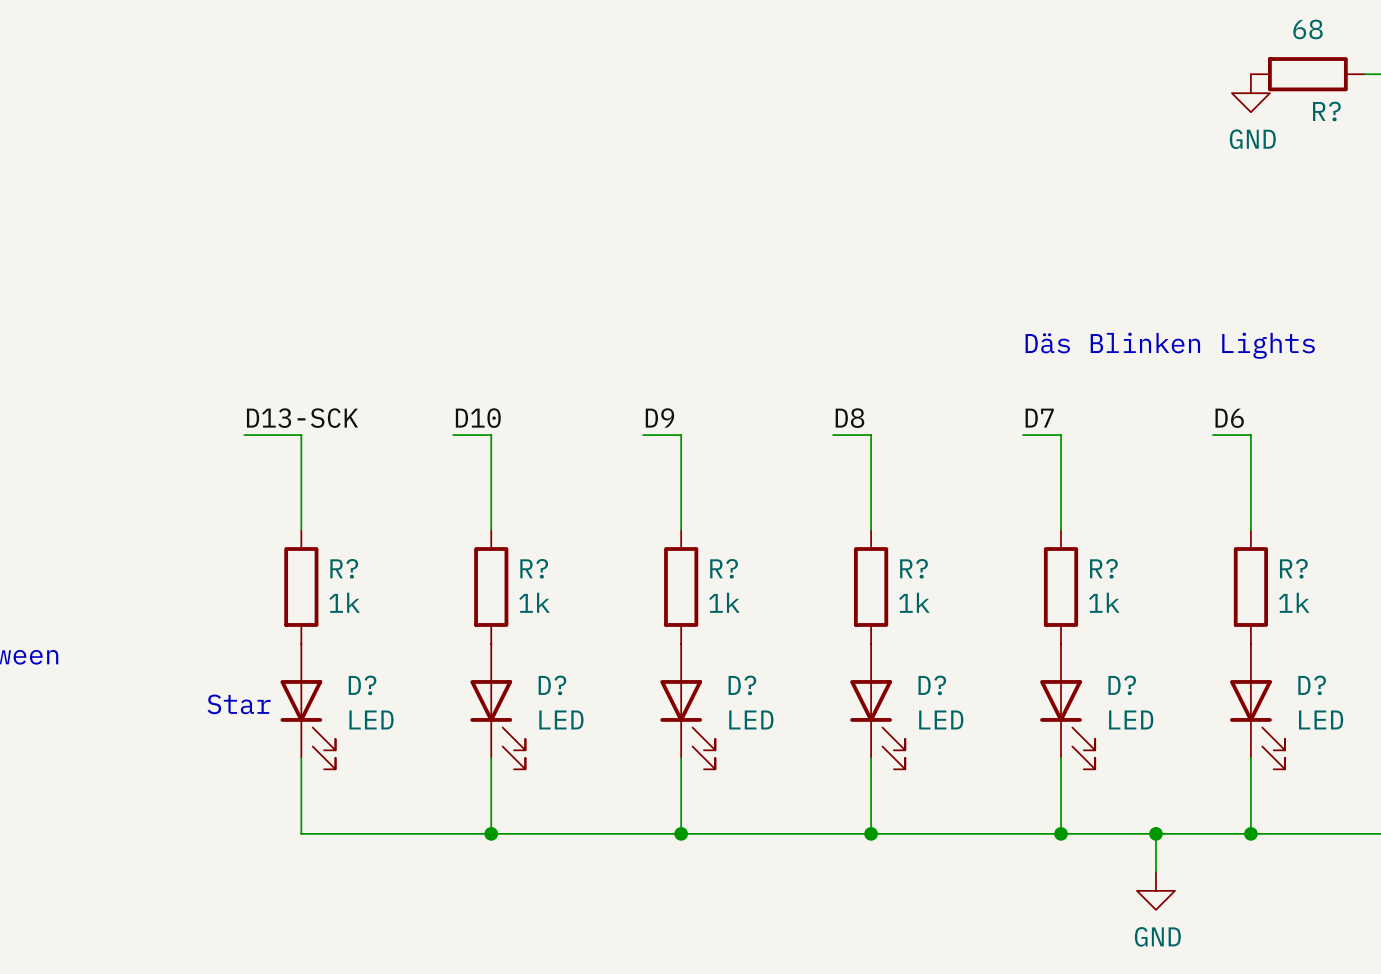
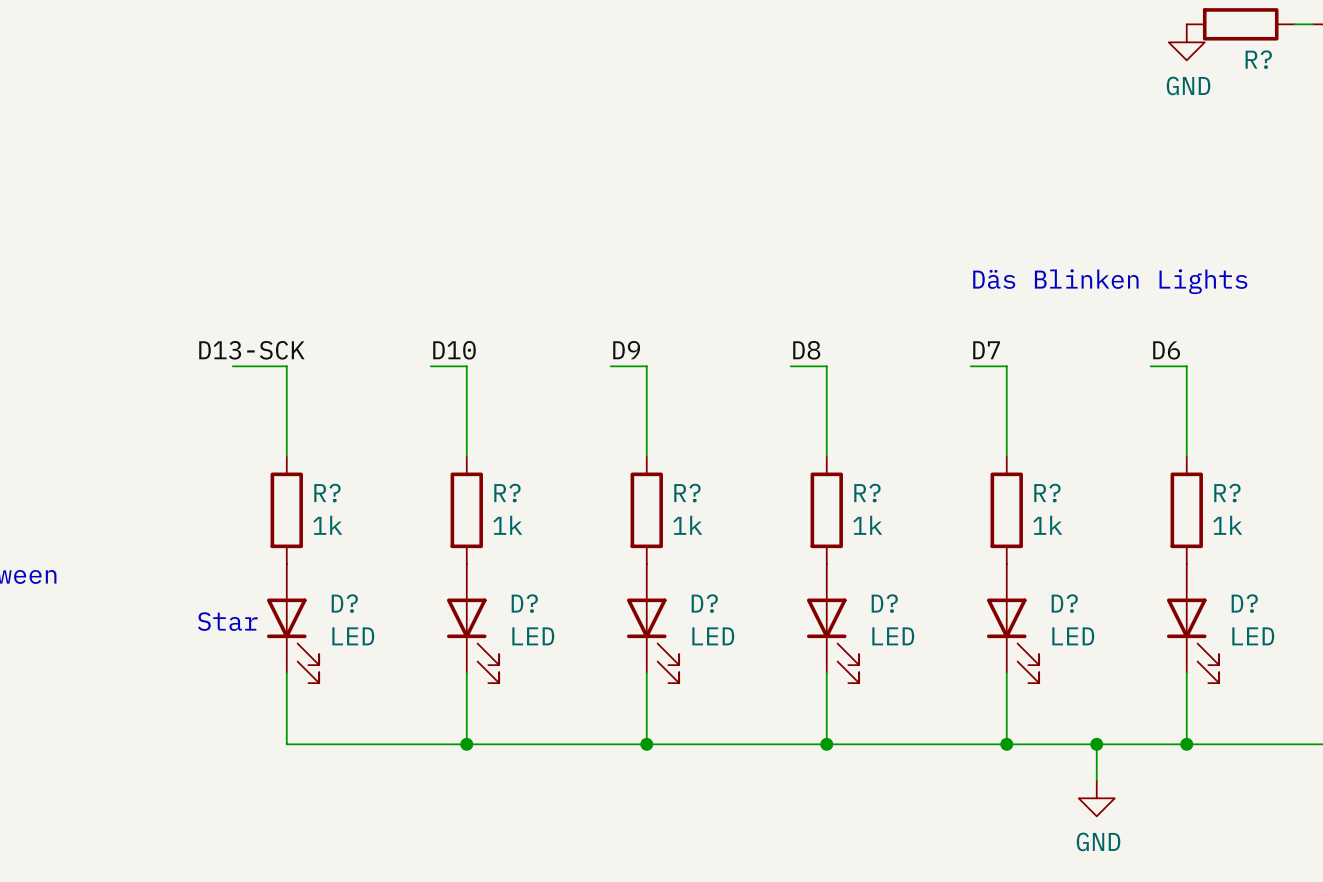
label position: D13-SCK (302, 418) -> D13-SCK (251, 350)

